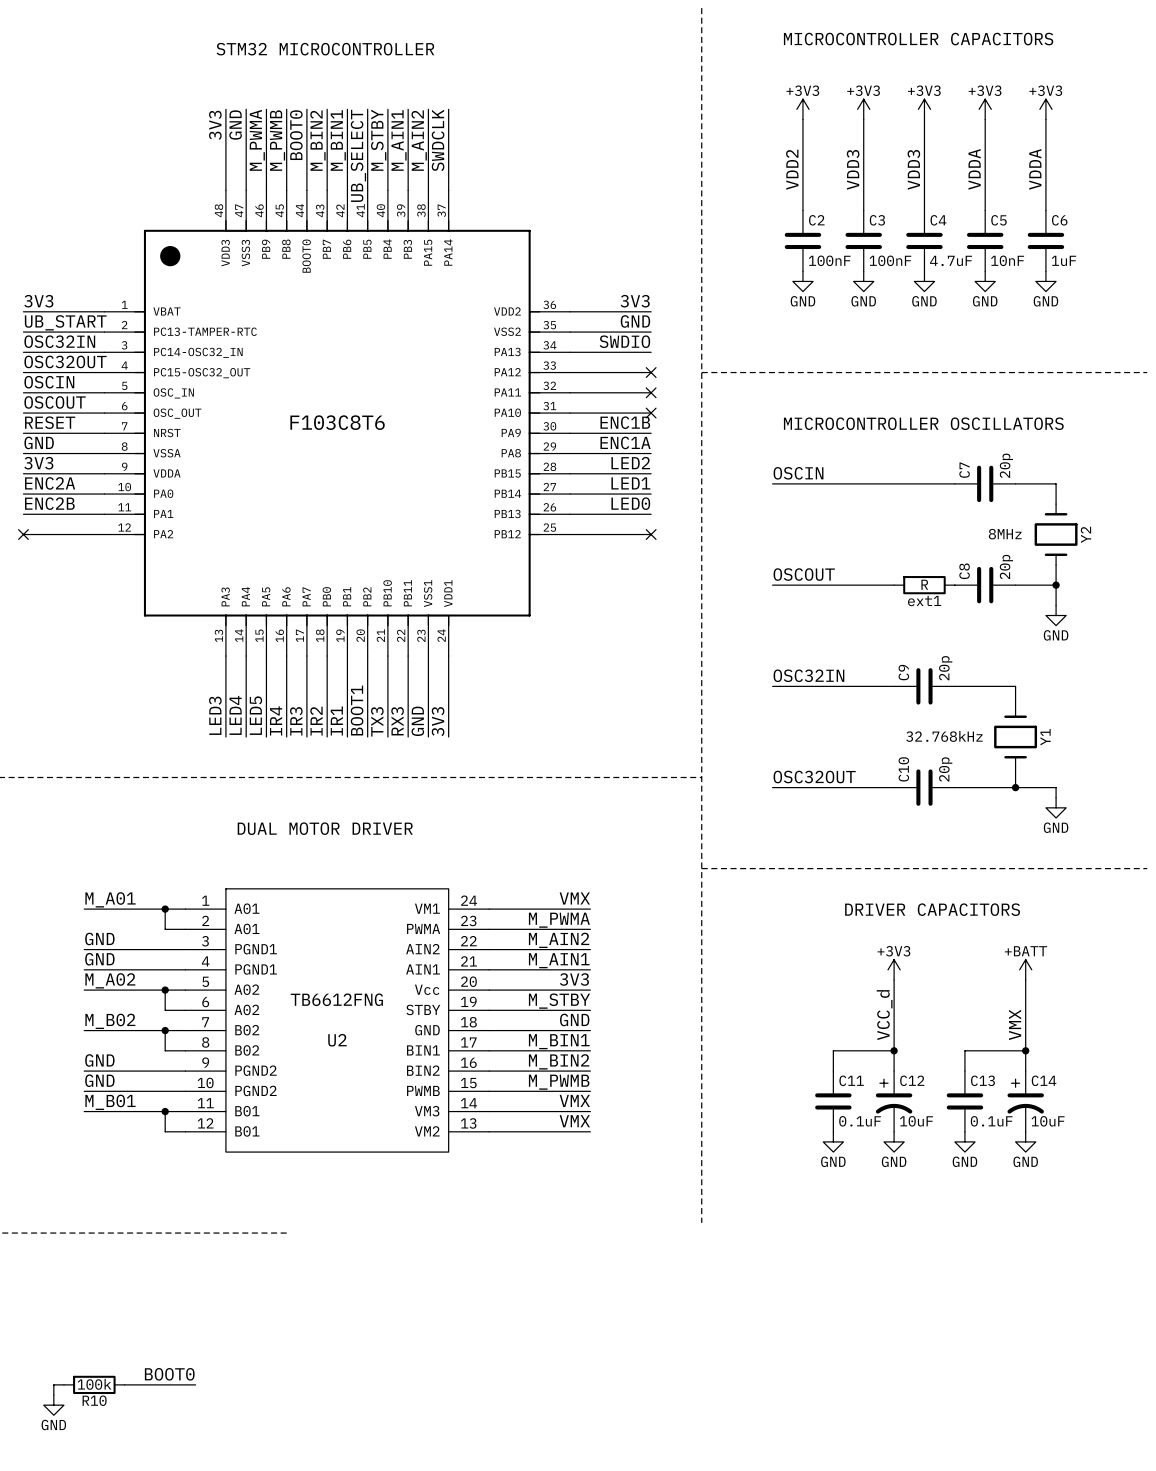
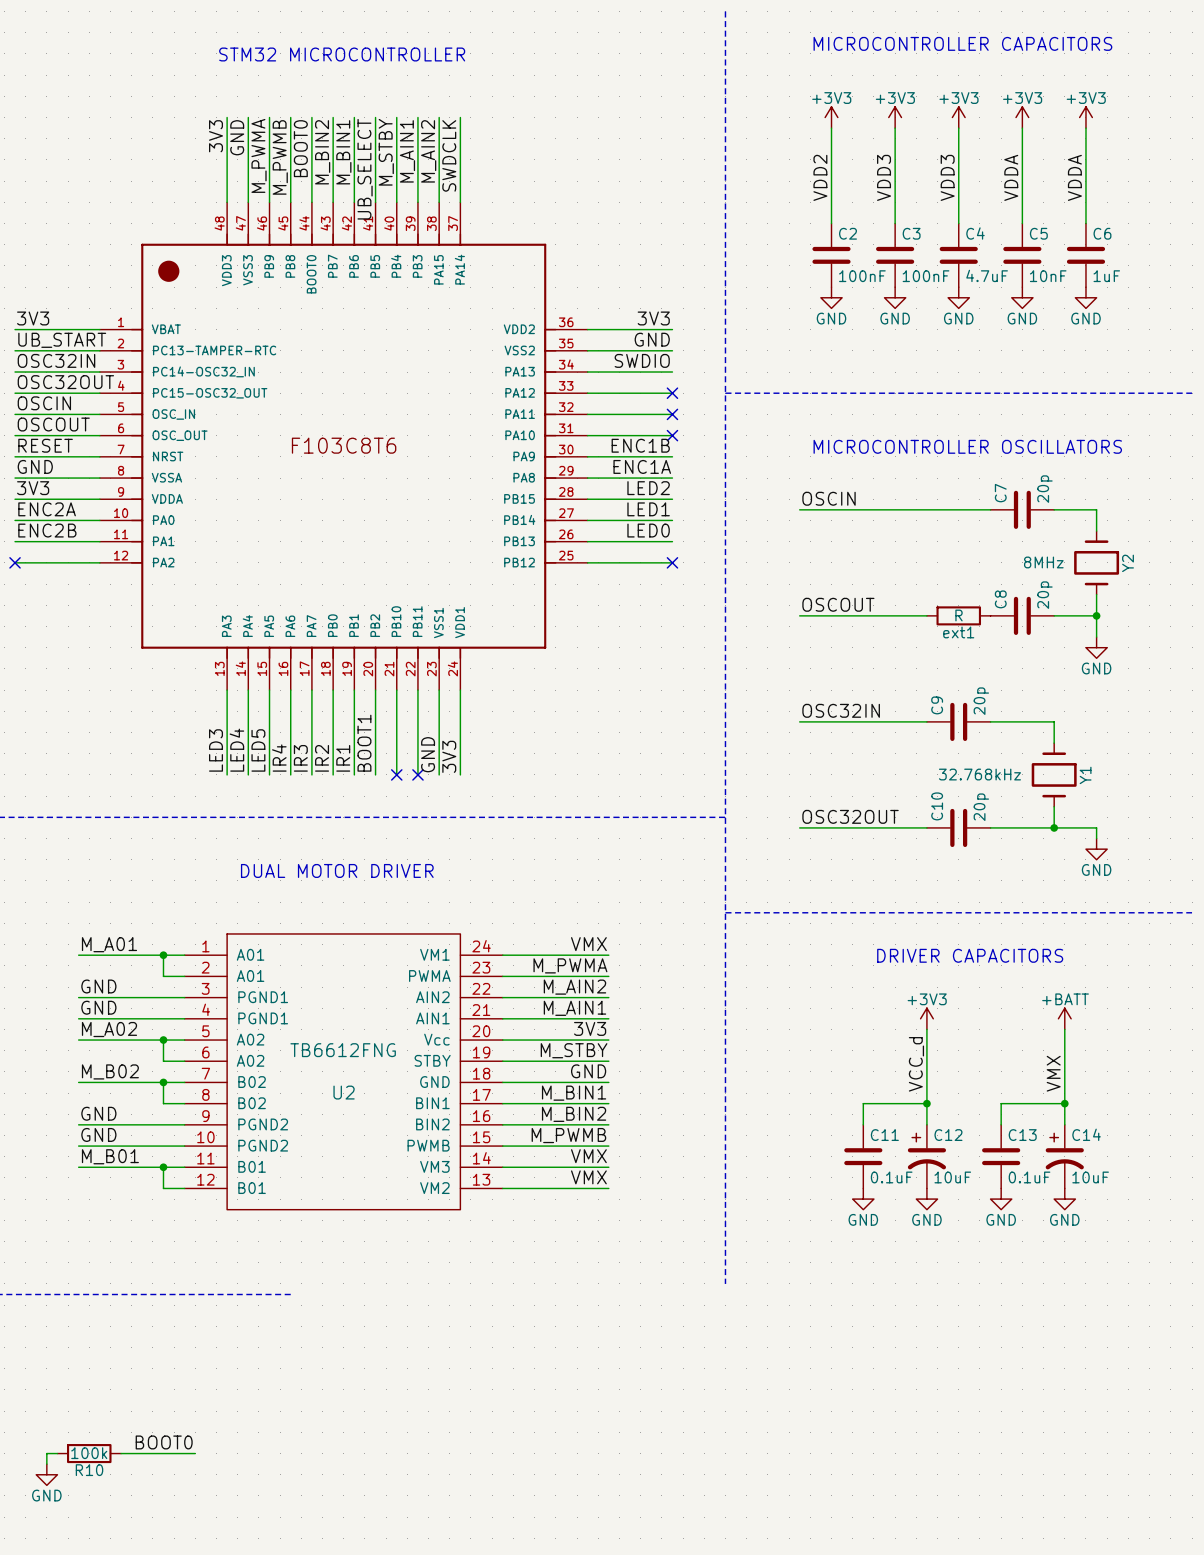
label: TX3 (377, 721) -> none
label: RX3 (397, 721) -> none
no-connect mark: none -> (396, 774)
no-connect mark: none -> (417, 774)

